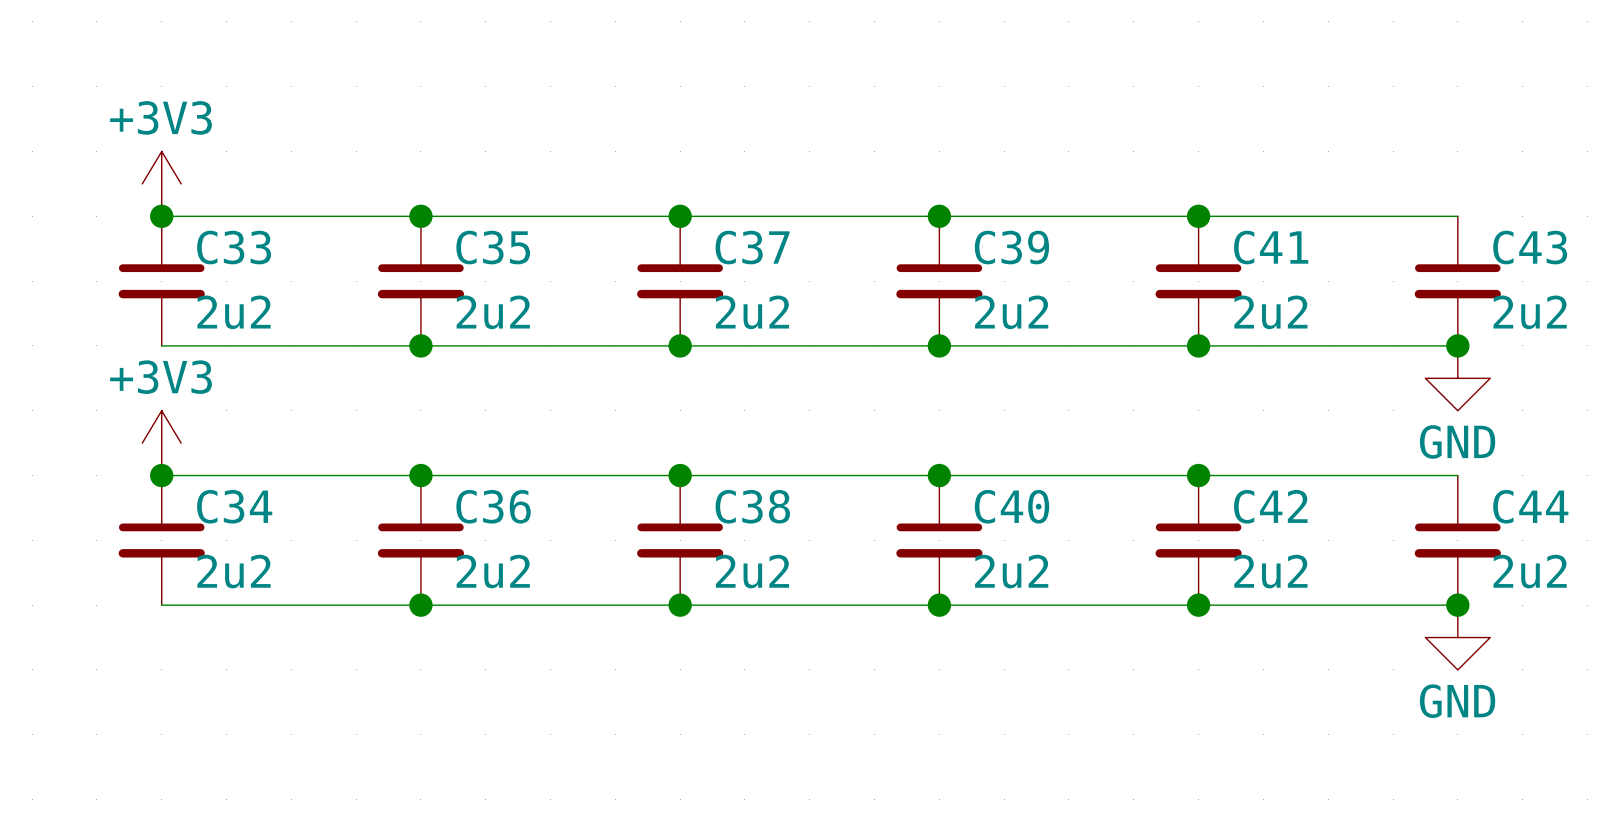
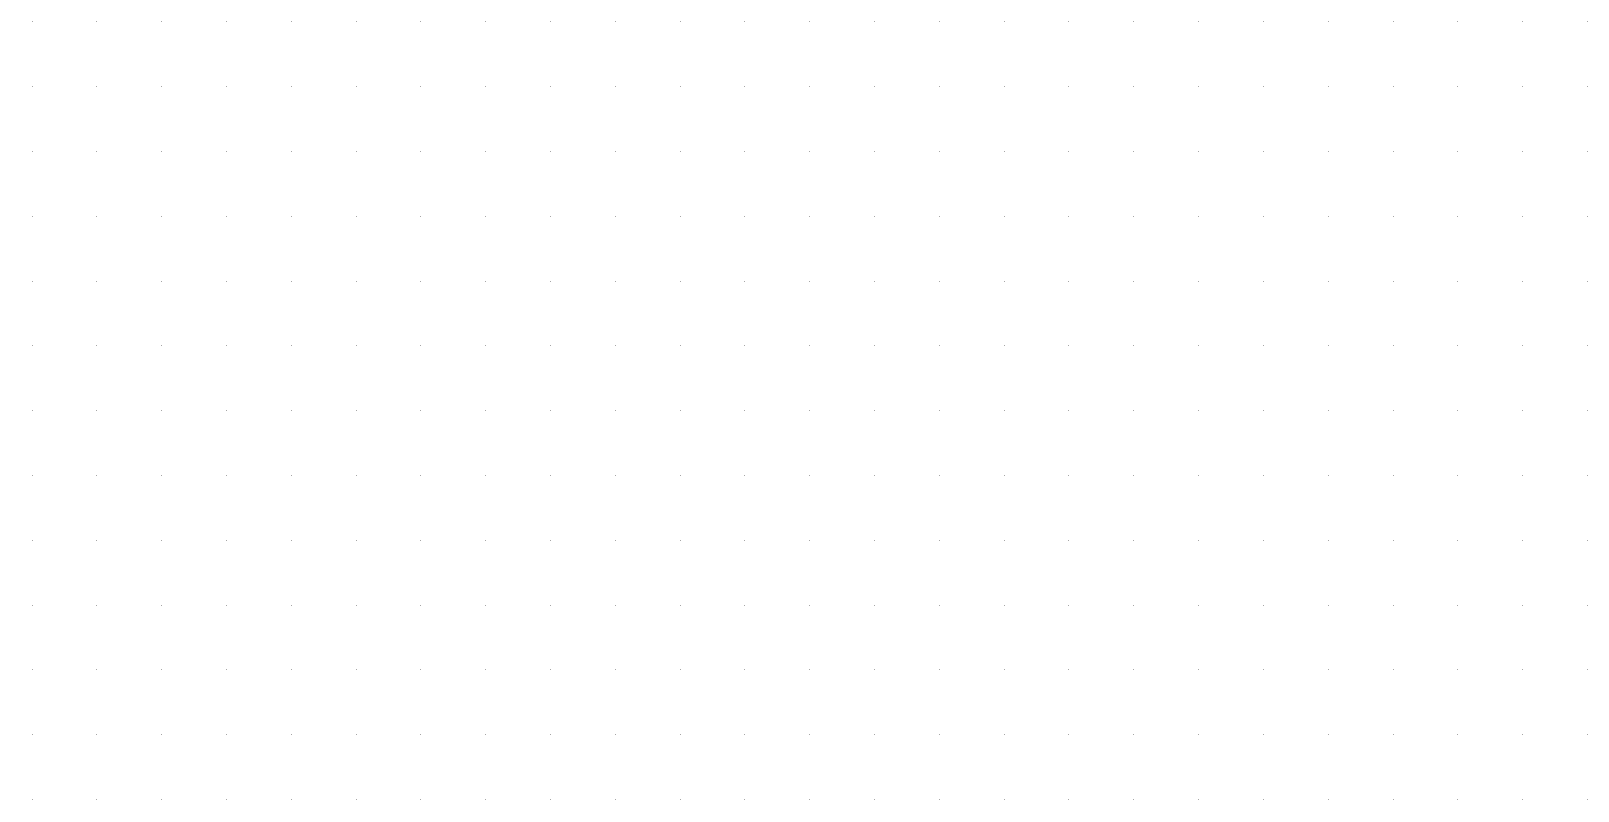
power symbol: +3V3 (161, 183) -> none
wire: (161, 216) (1457, 216) -> none
junction: (161, 216) -> none
junction: (420, 216) -> none
junction: (680, 216) -> none
junction: (939, 216) -> none
junction: (1198, 216) -> none
C33: 2u2 (161, 281) -> none
C35: 2u2 (420, 281) -> none
C37: 2u2 (680, 281) -> none
C39: 2u2 (939, 281) -> none
C41: 2u2 (1198, 281) -> none
C43: 2u2 (1457, 281) -> none
wire: (161, 345) (1457, 345) -> none
junction: (420, 345) -> none
junction: (680, 345) -> none
junction: (939, 345) -> none
junction: (1198, 345) -> none
junction: (1457, 345) -> none
power symbol: GND (1457, 378) -> none
power symbol: +3V3 (161, 443) -> none
wire: (161, 475) (1457, 475) -> none
junction: (161, 475) -> none
junction: (420, 475) -> none
junction: (680, 475) -> none
junction: (939, 475) -> none
junction: (1198, 475) -> none
C34: 2u2 (161, 540) -> none
C36: 2u2 (420, 540) -> none
C38: 2u2 (680, 540) -> none
C40: 2u2 (939, 540) -> none
C42: 2u2 (1198, 540) -> none
C44: 2u2 (1457, 540) -> none
wire: (161, 605) (1457, 605) -> none
junction: (420, 605) -> none
junction: (680, 605) -> none
junction: (939, 605) -> none
junction: (1198, 605) -> none
junction: (1457, 605) -> none
power symbol: GND (1457, 637) -> none

